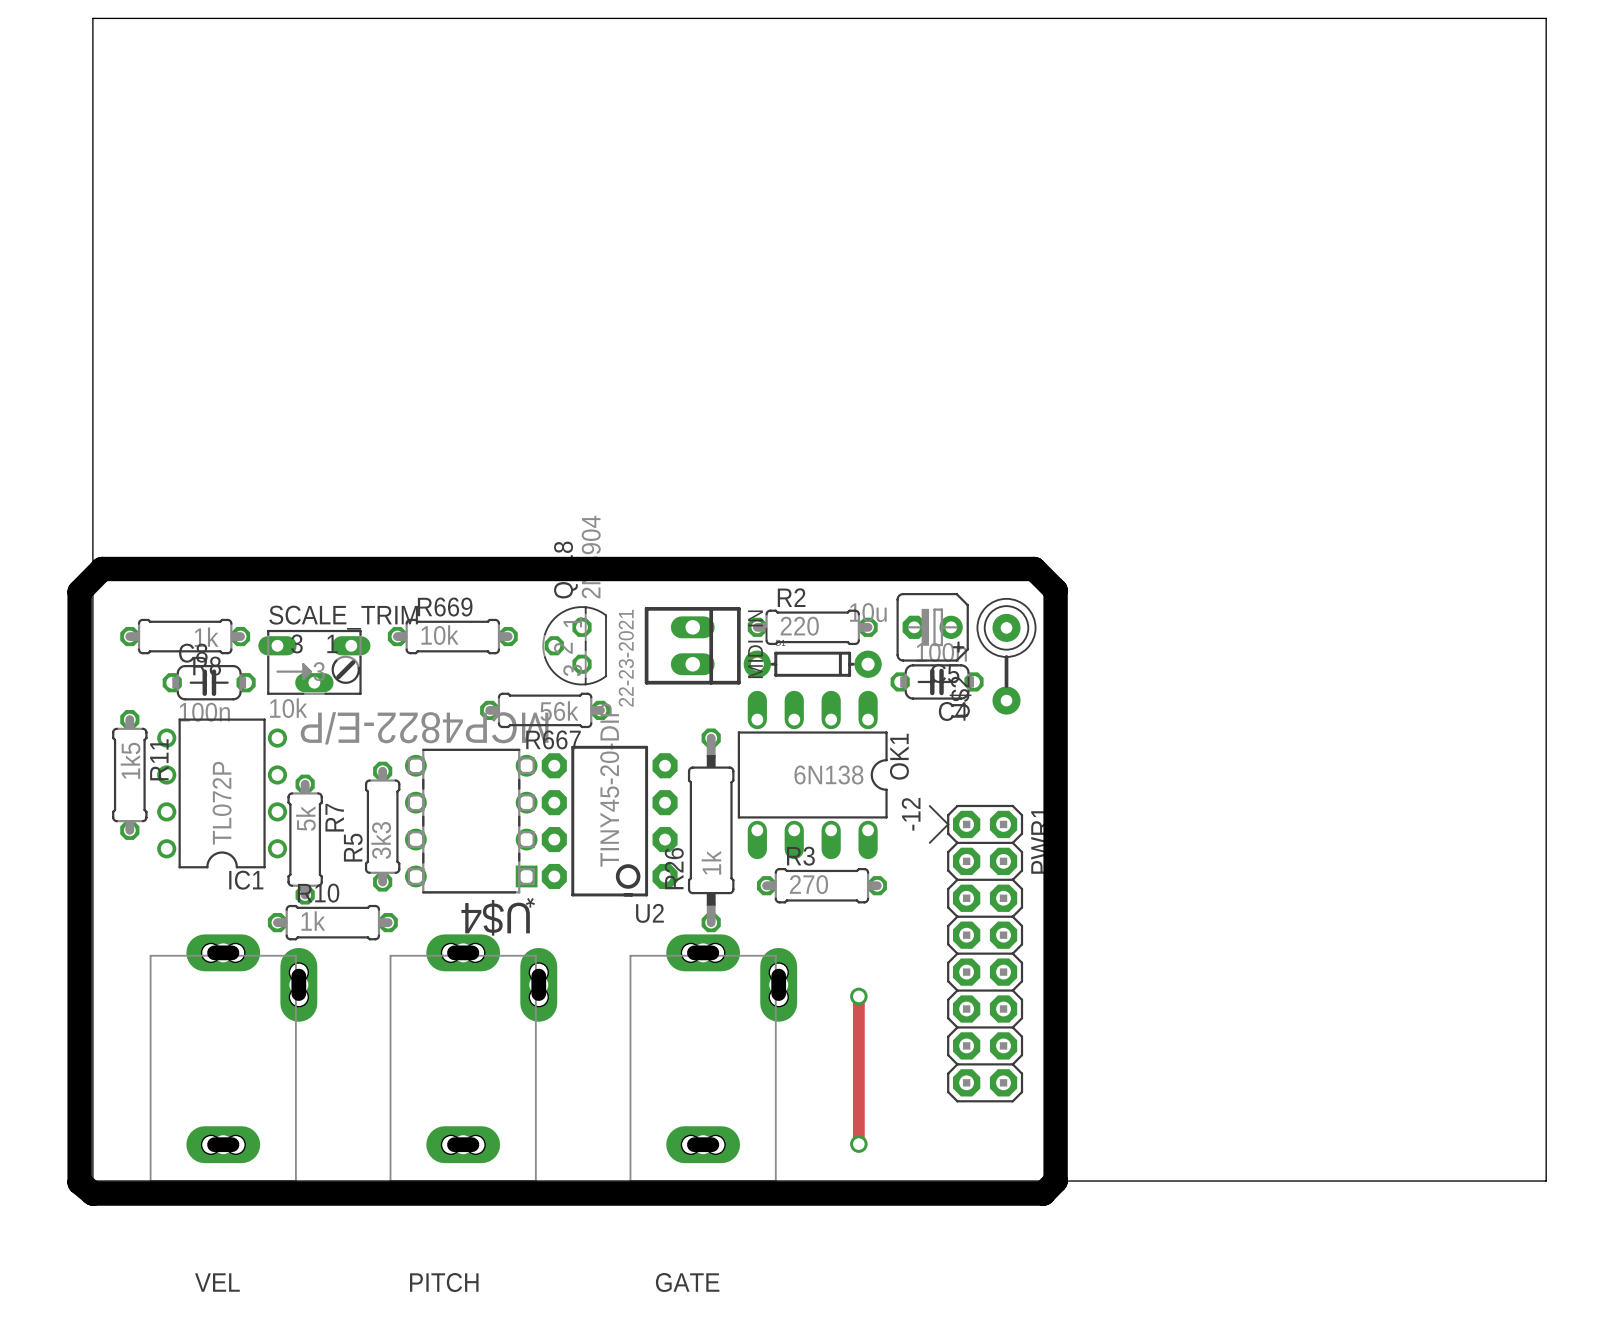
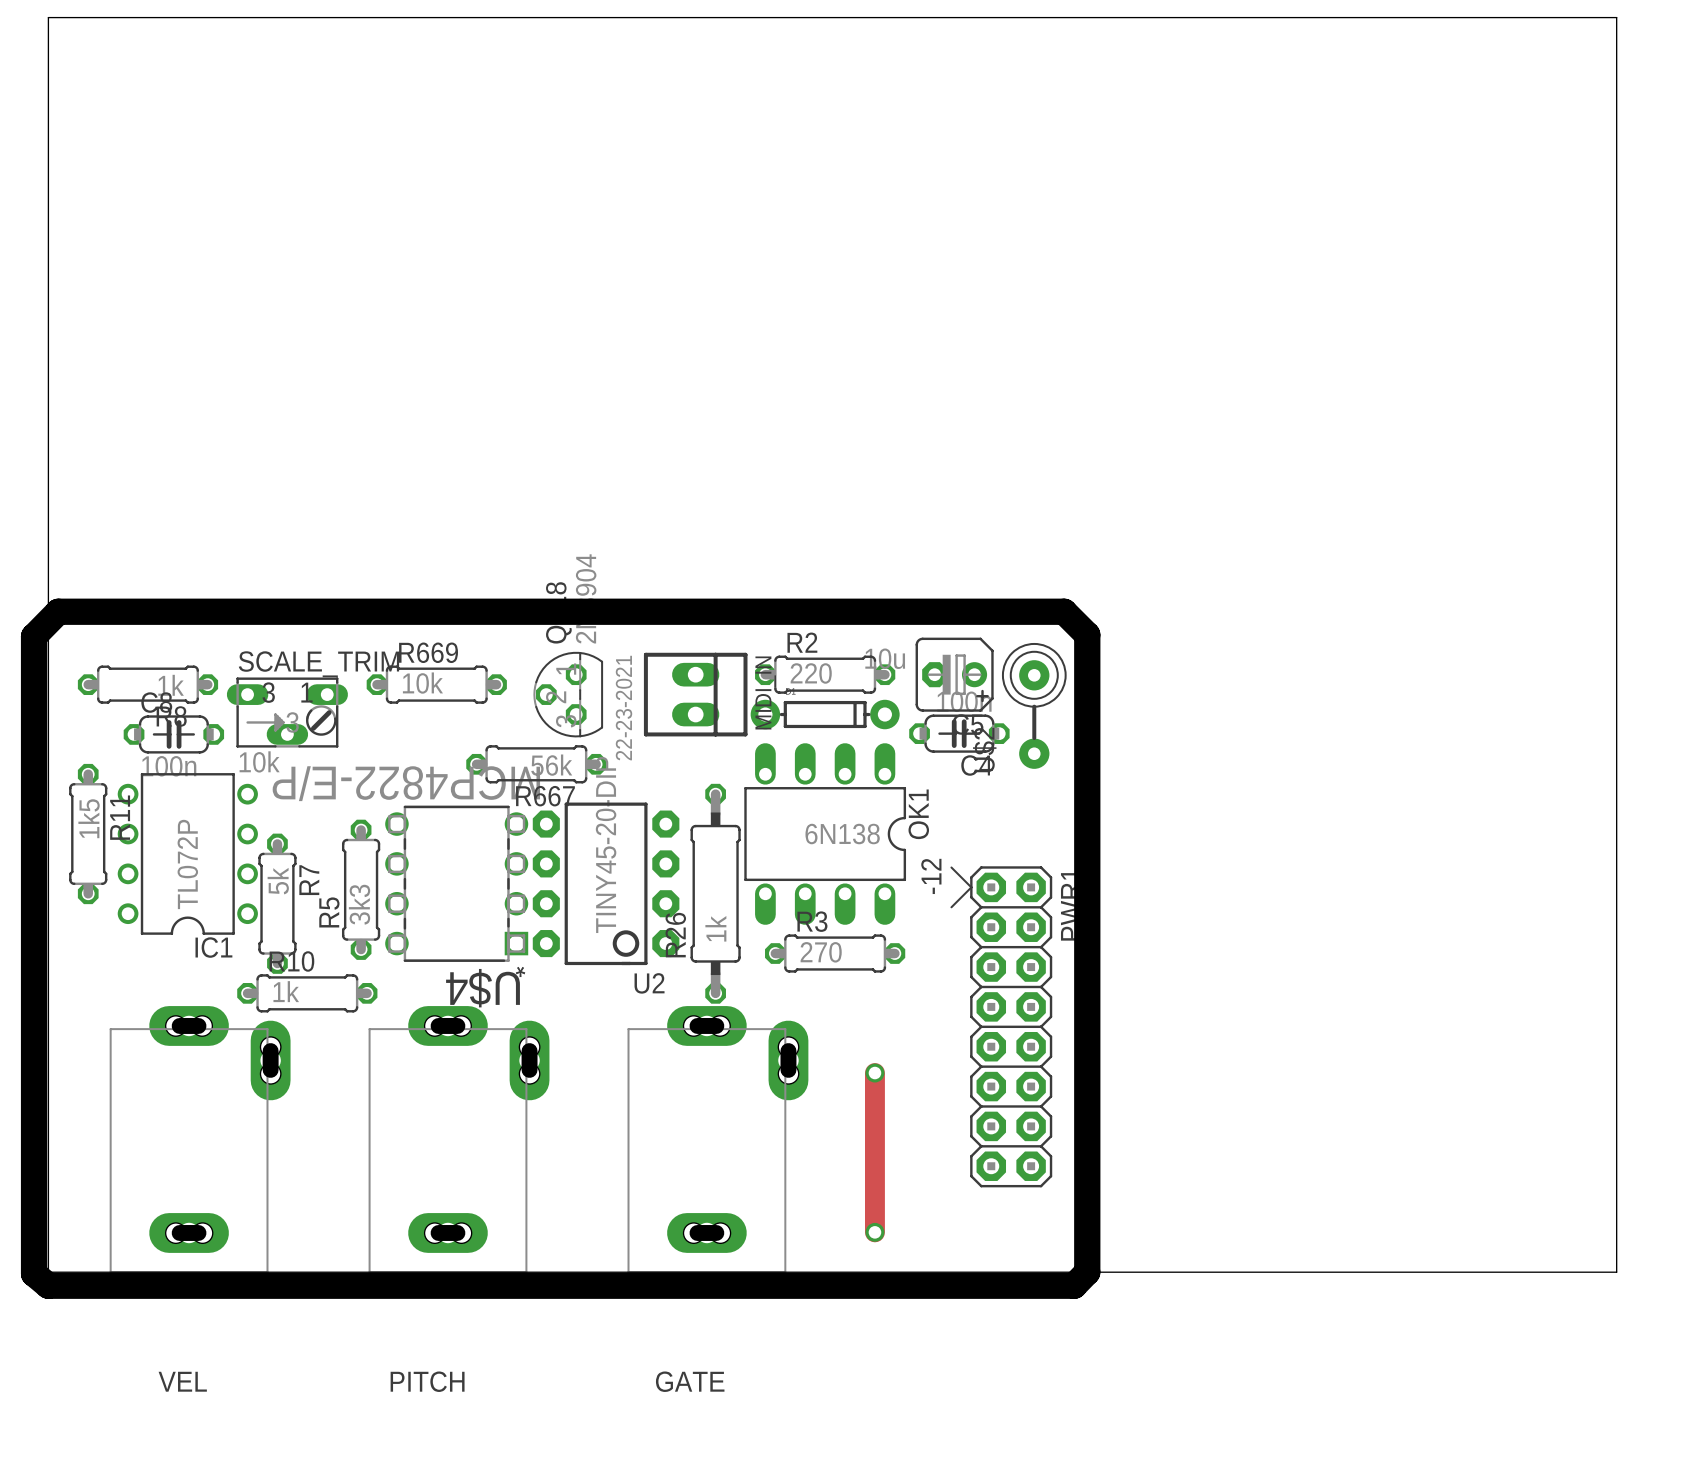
track width: thin (858, 996) (858, 1144) -> thick (874, 1073) (874, 1232)

